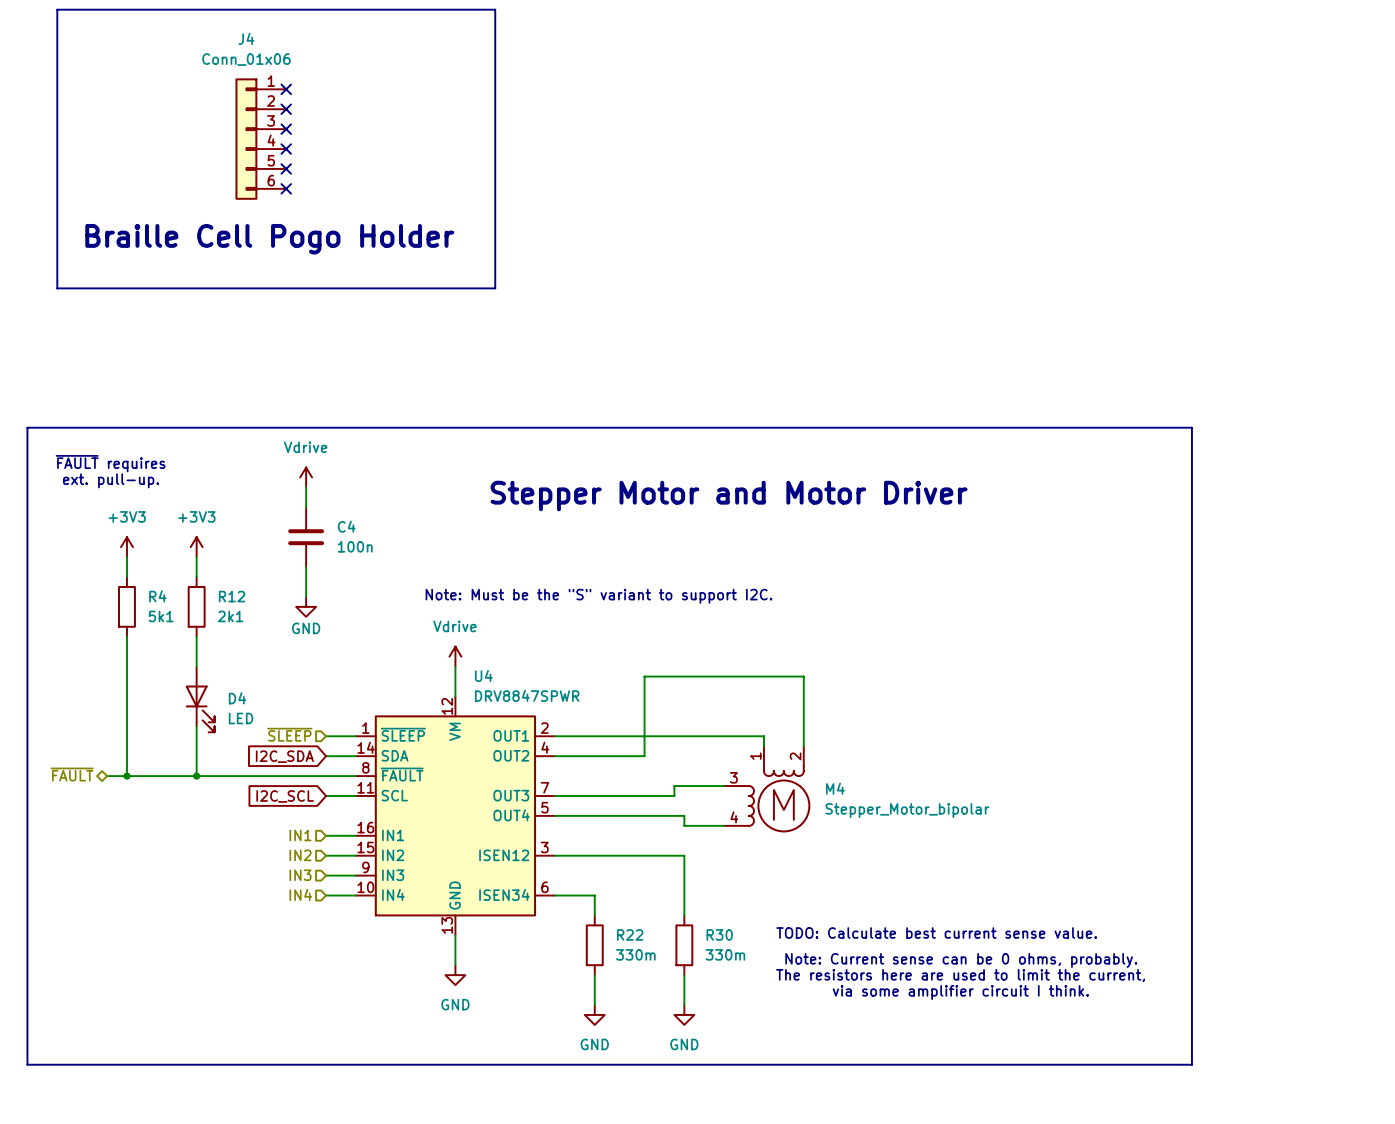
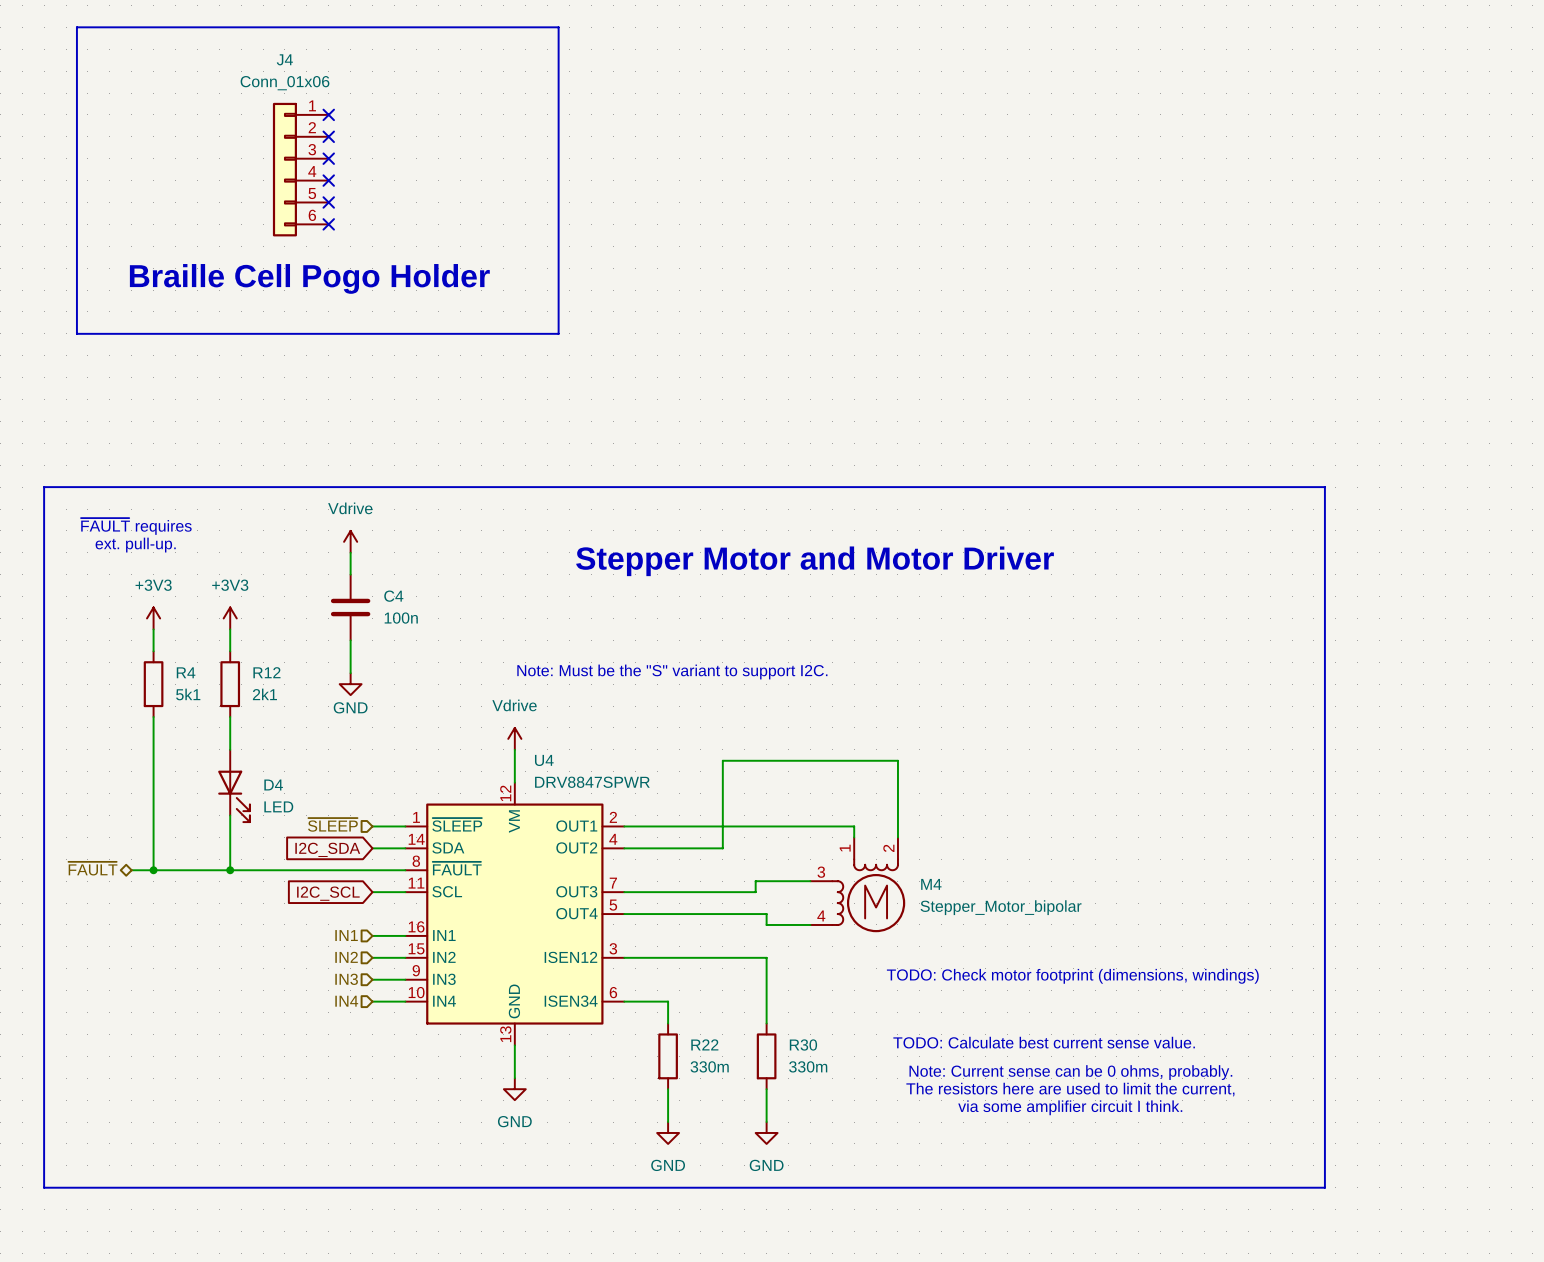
text: none -> TODO: Check motor footprint (dimensions, windings) (1072, 976)

